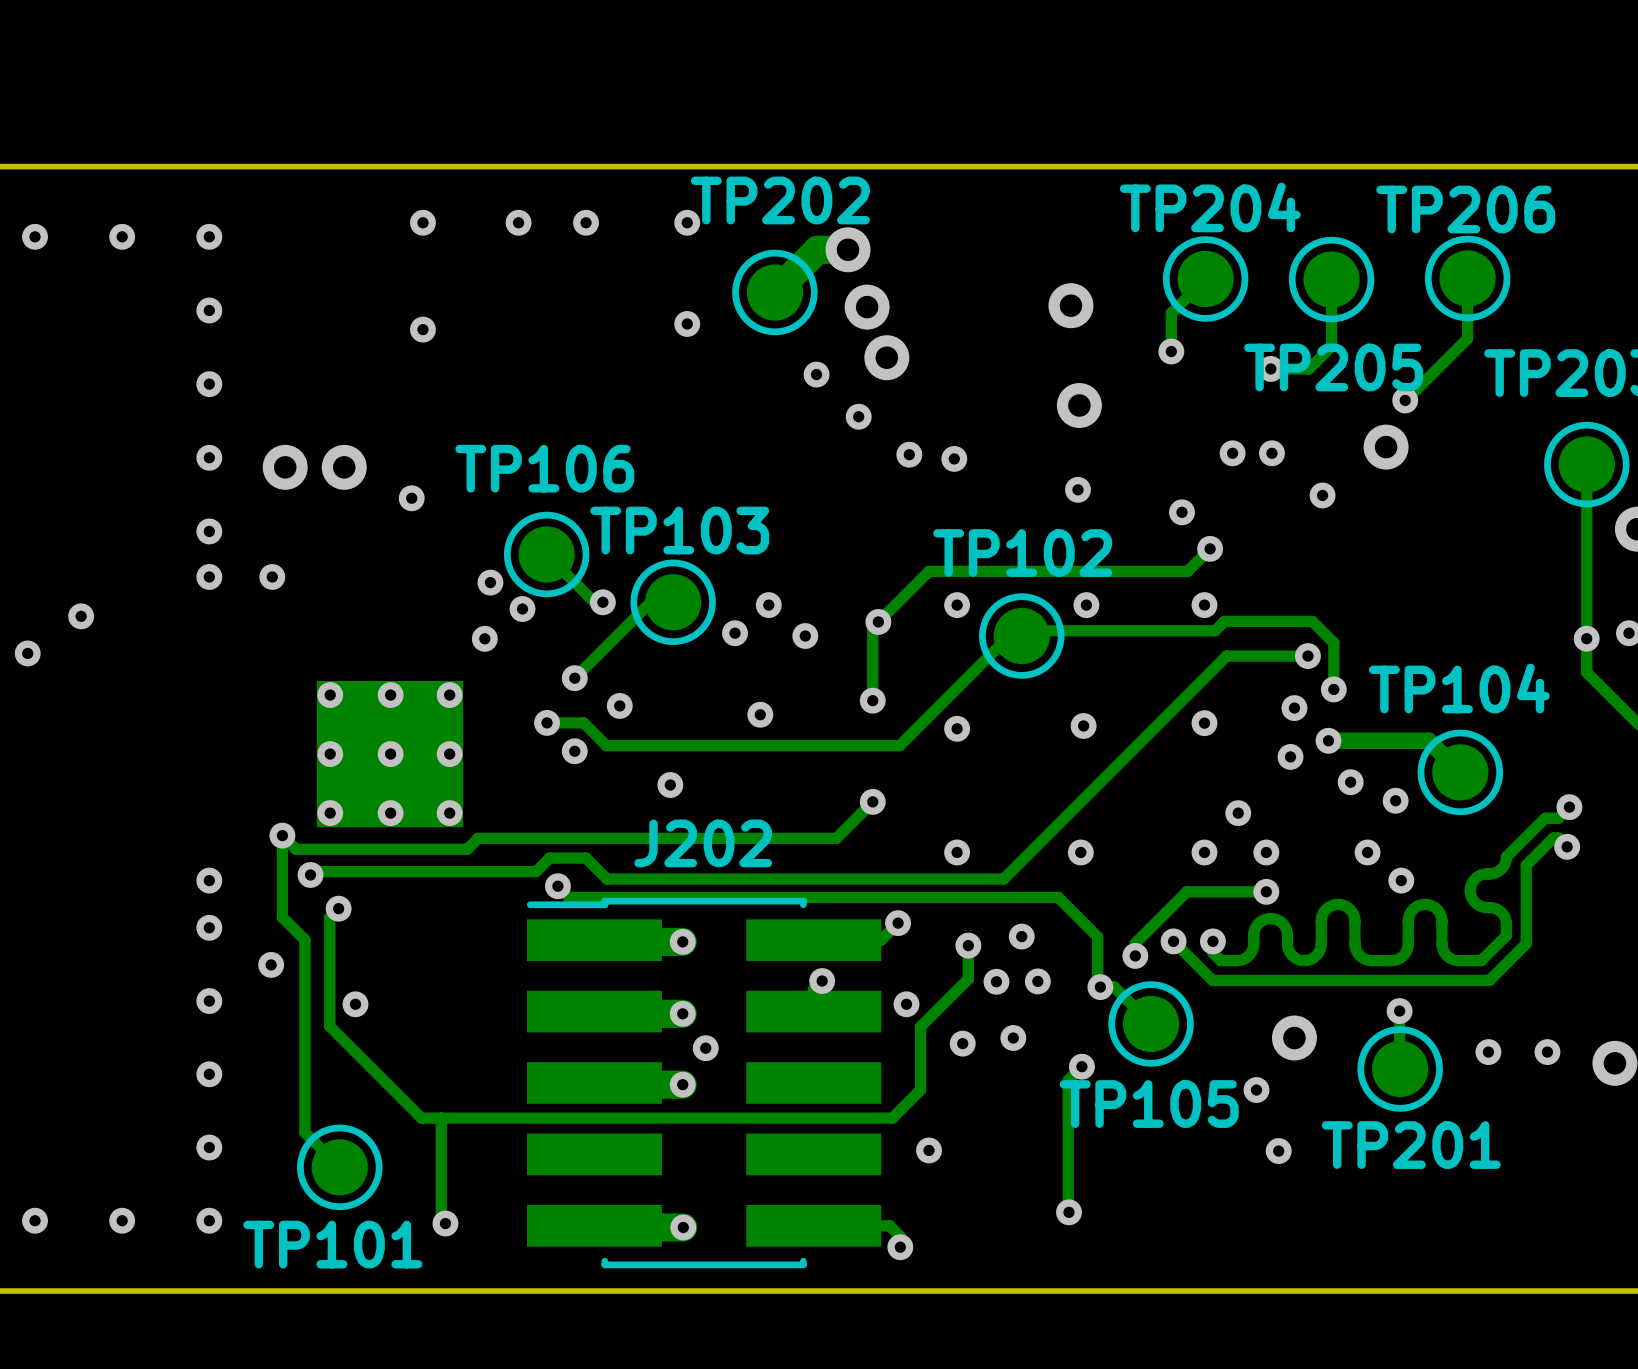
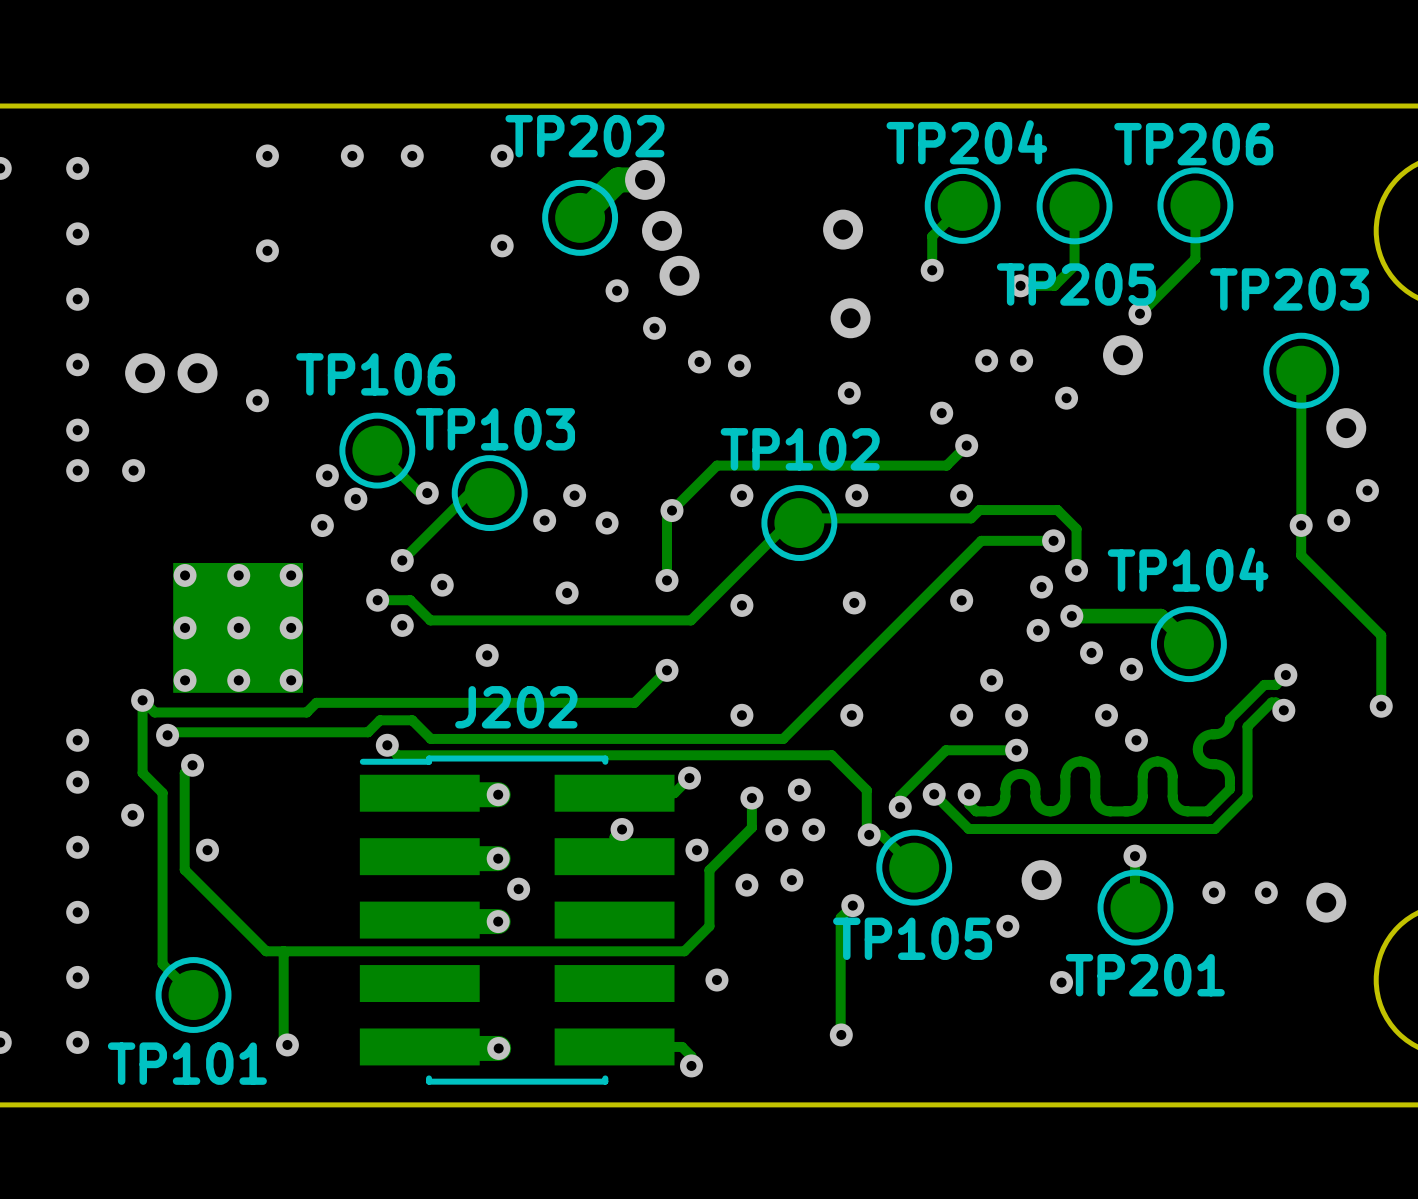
via position: (1278, 1151) -> (1061, 982)

